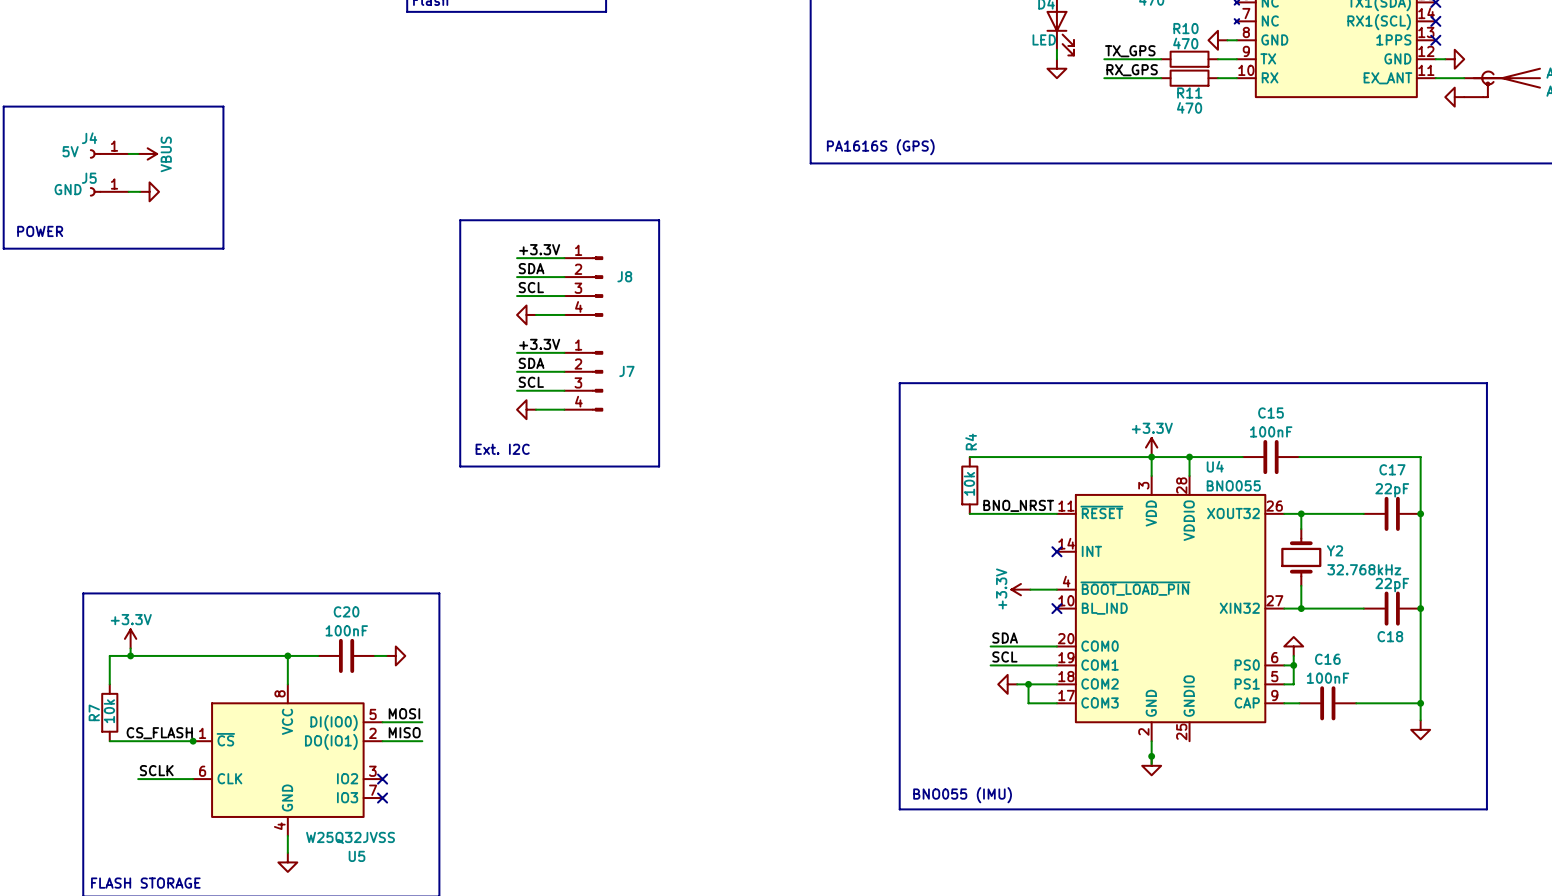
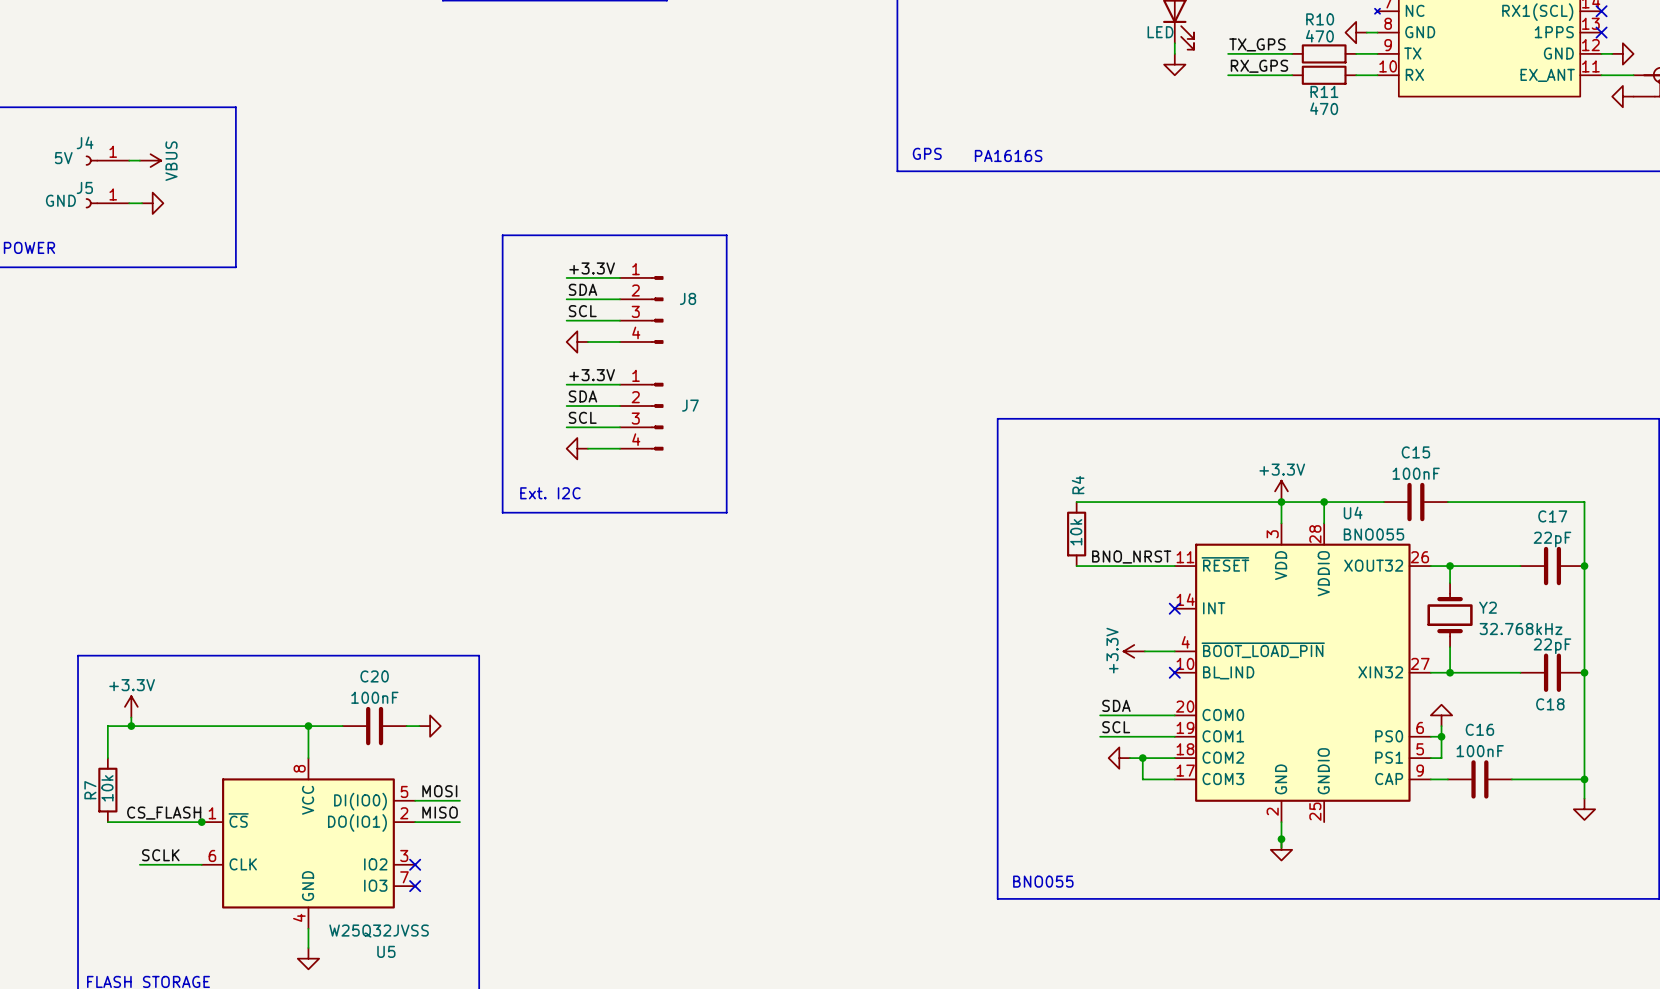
text: none -> GPS (927, 153)
text: PA1616S (GPS) (880, 147) -> PA1616S (1008, 155)
text: BNO055 (IMU) (962, 795) -> BNO055 (1043, 881)

